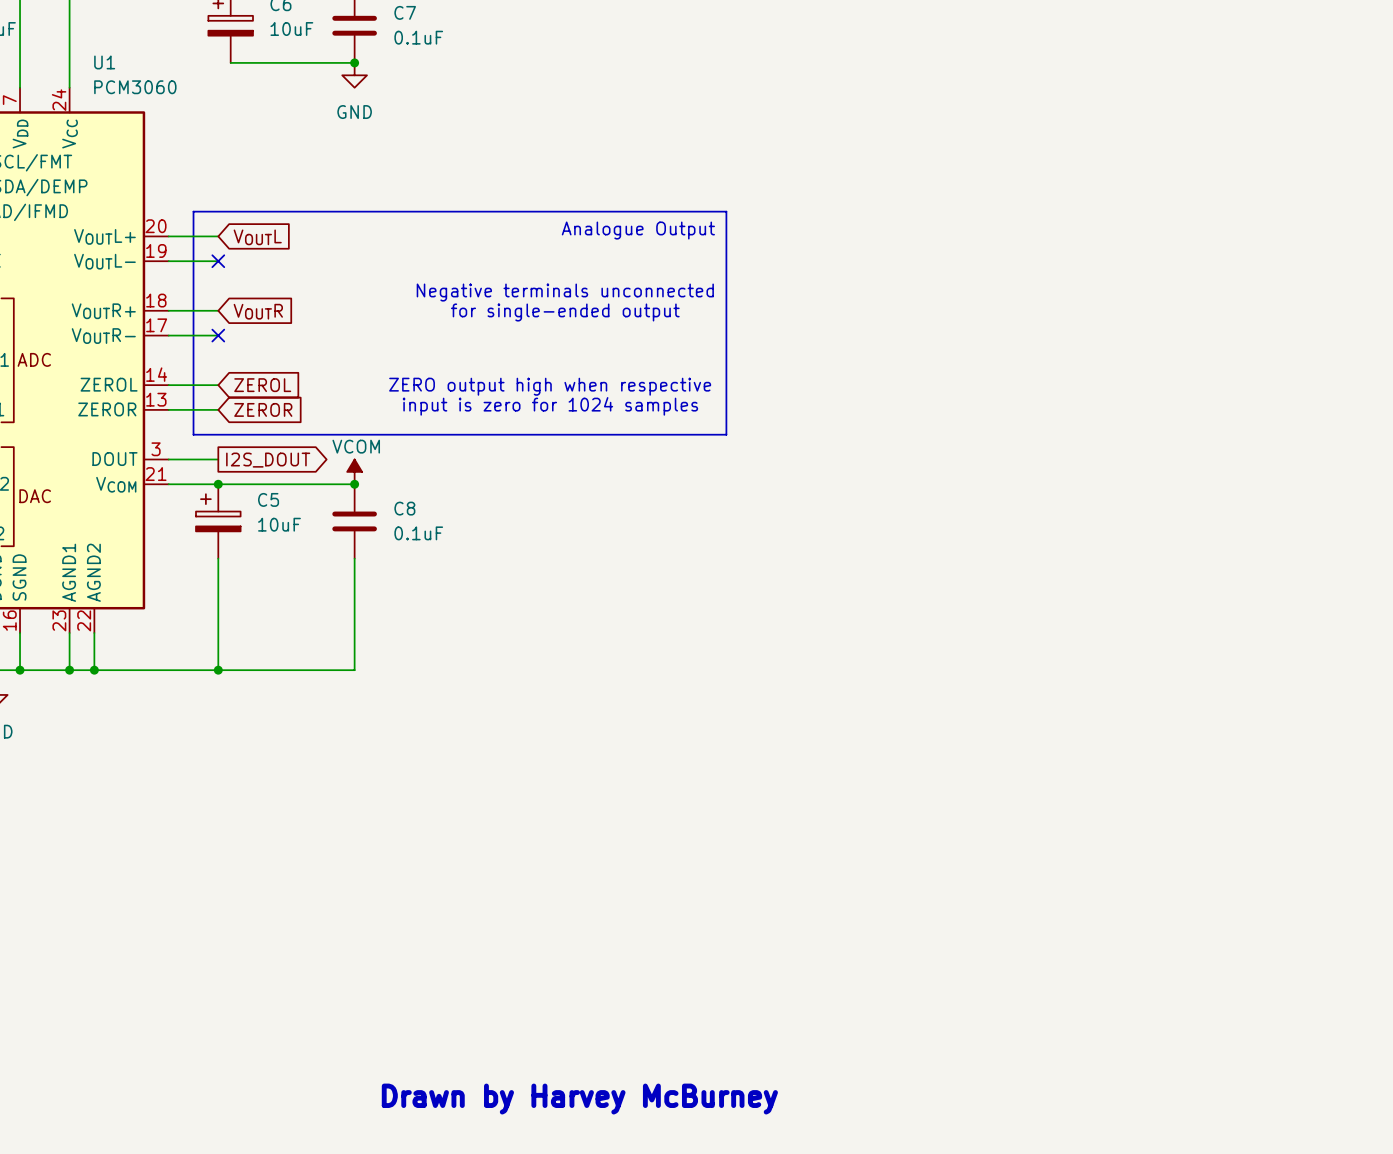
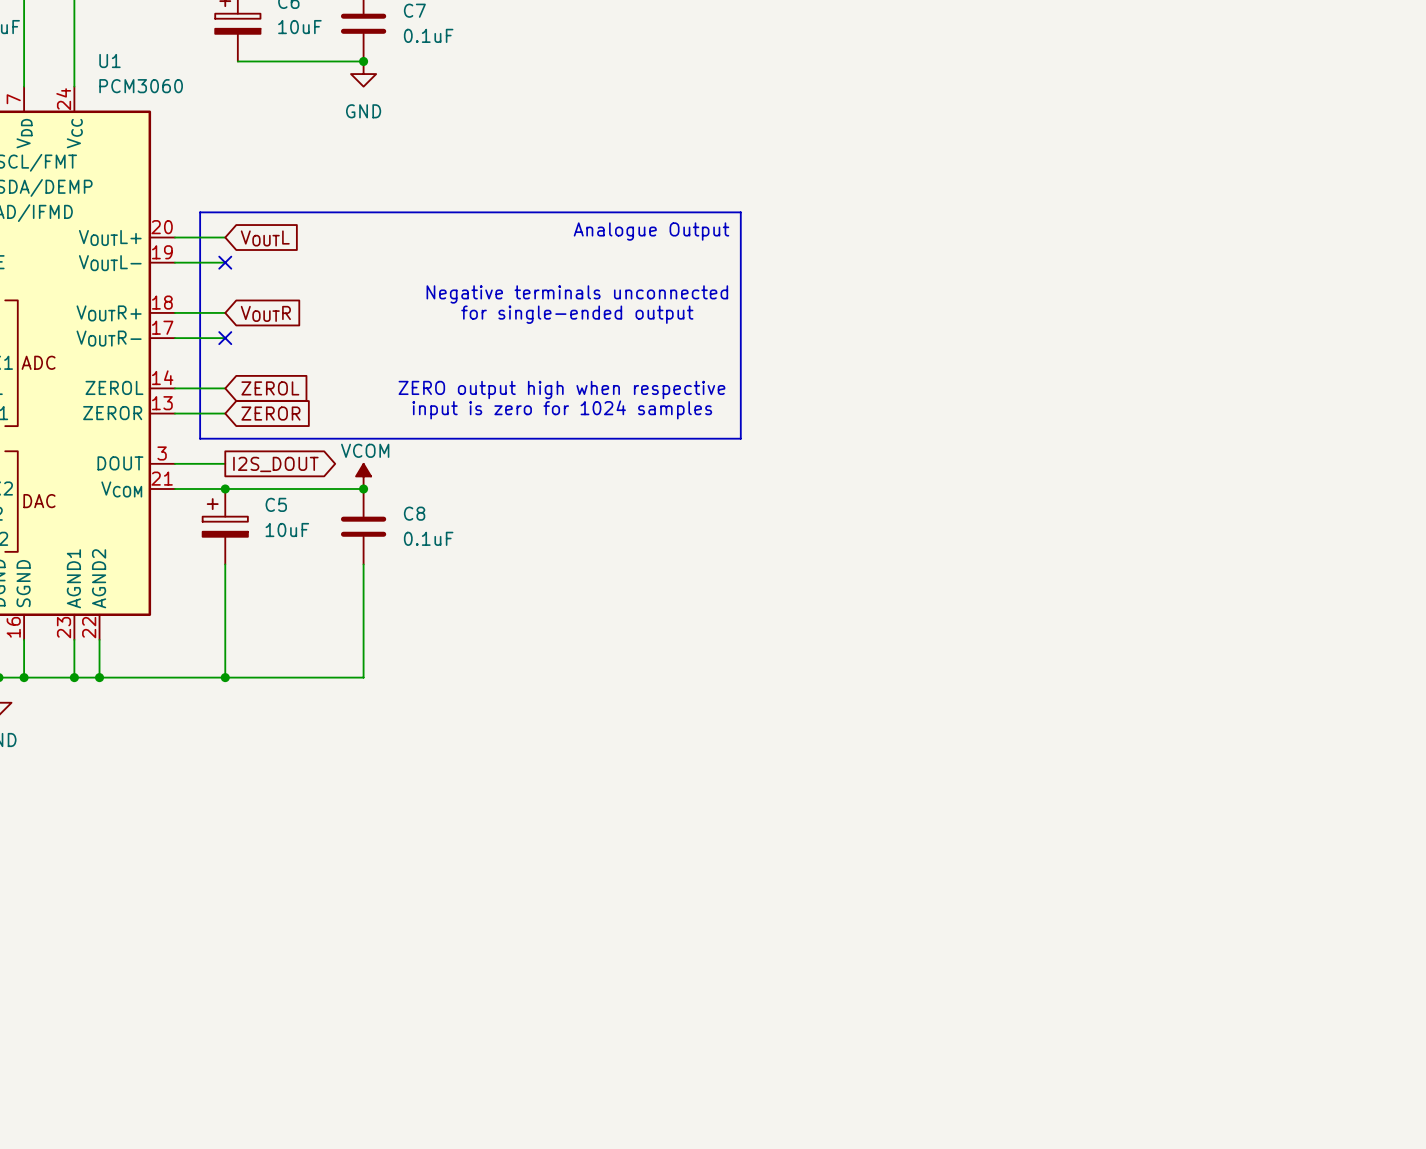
text: Drawn by Harvey McBurney (579, 1099) -> none

